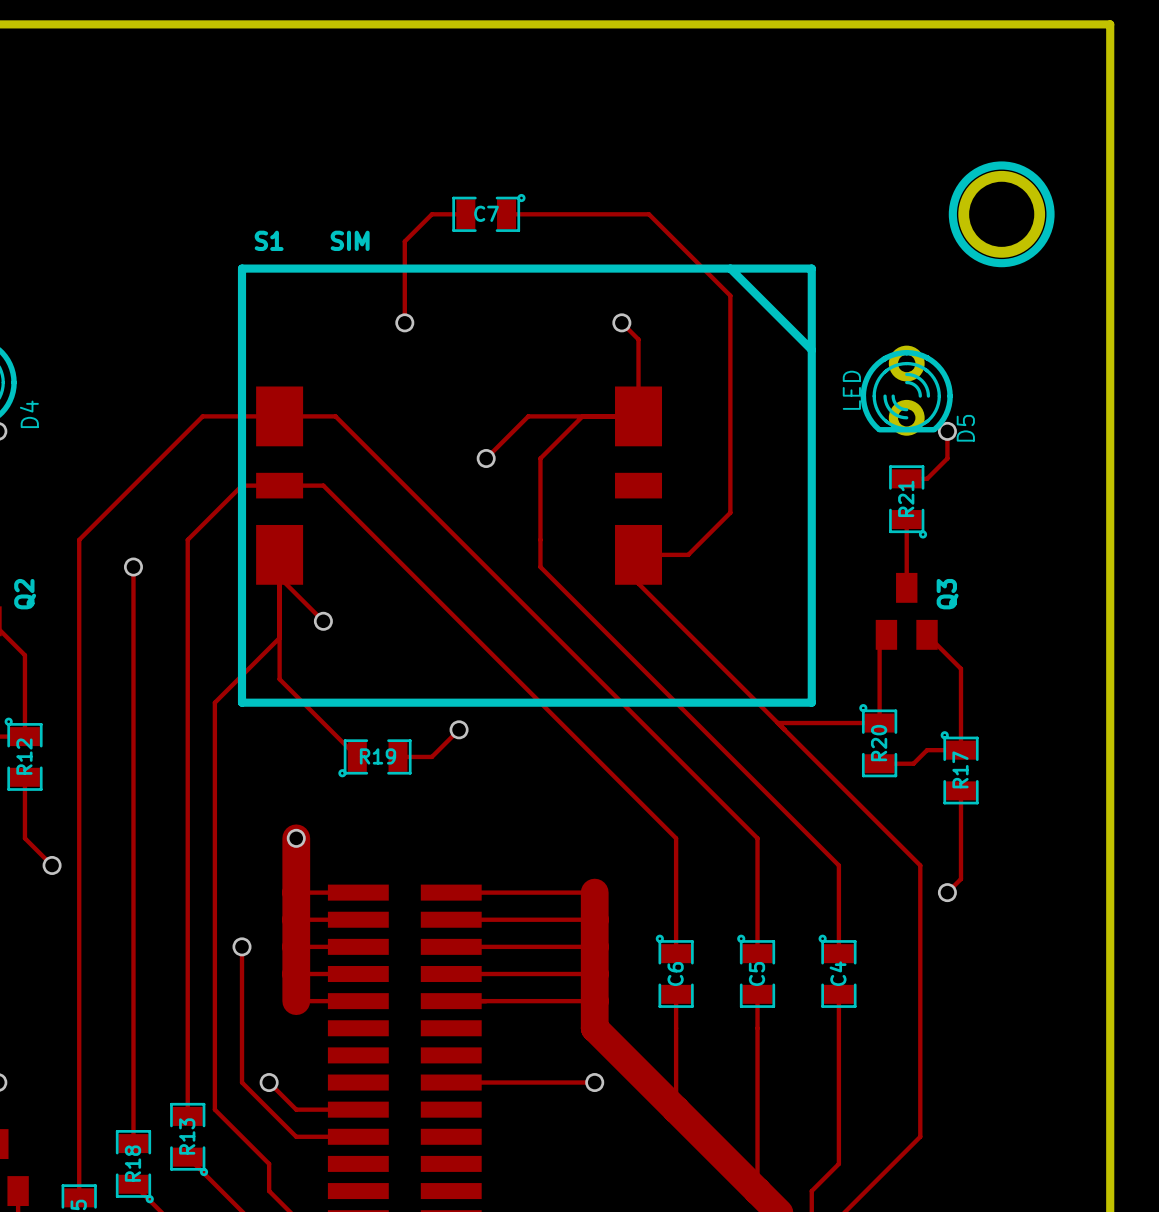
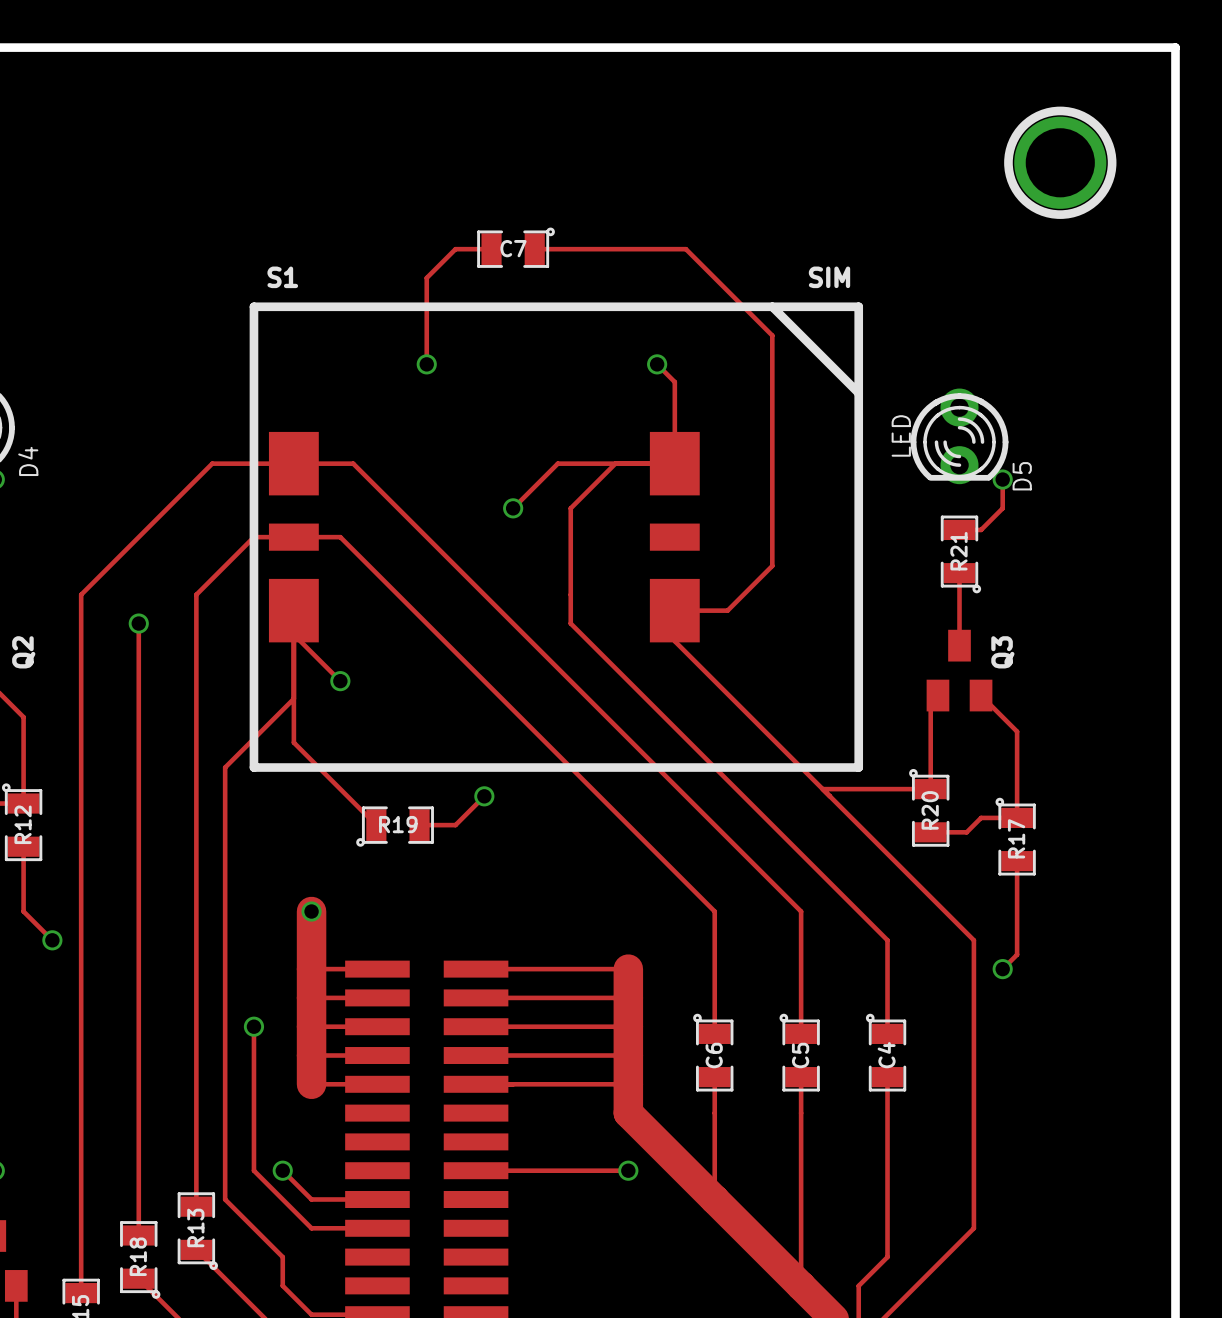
part position: (1001, 214) -> (1060, 162)
S1 value position: SIM (350, 240) -> SIM (829, 277)

